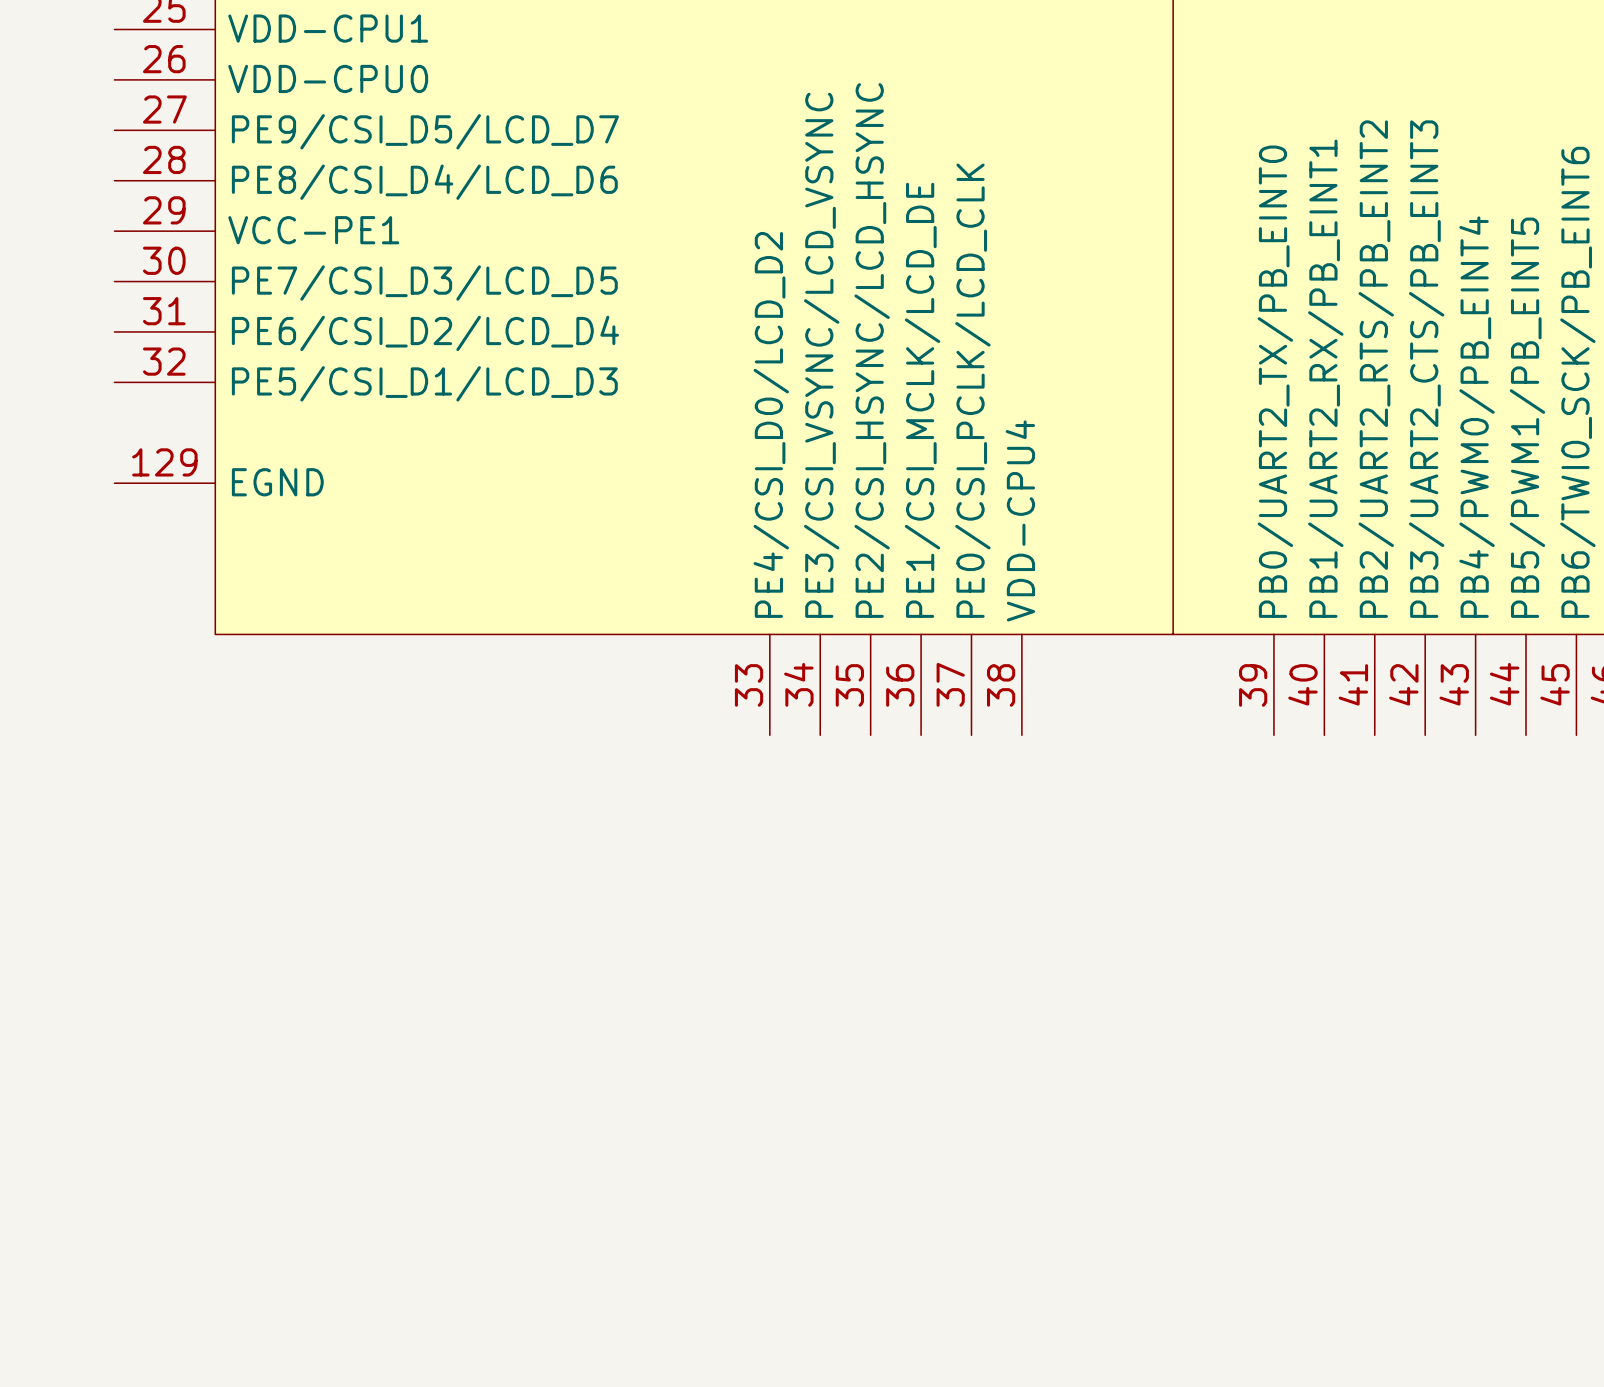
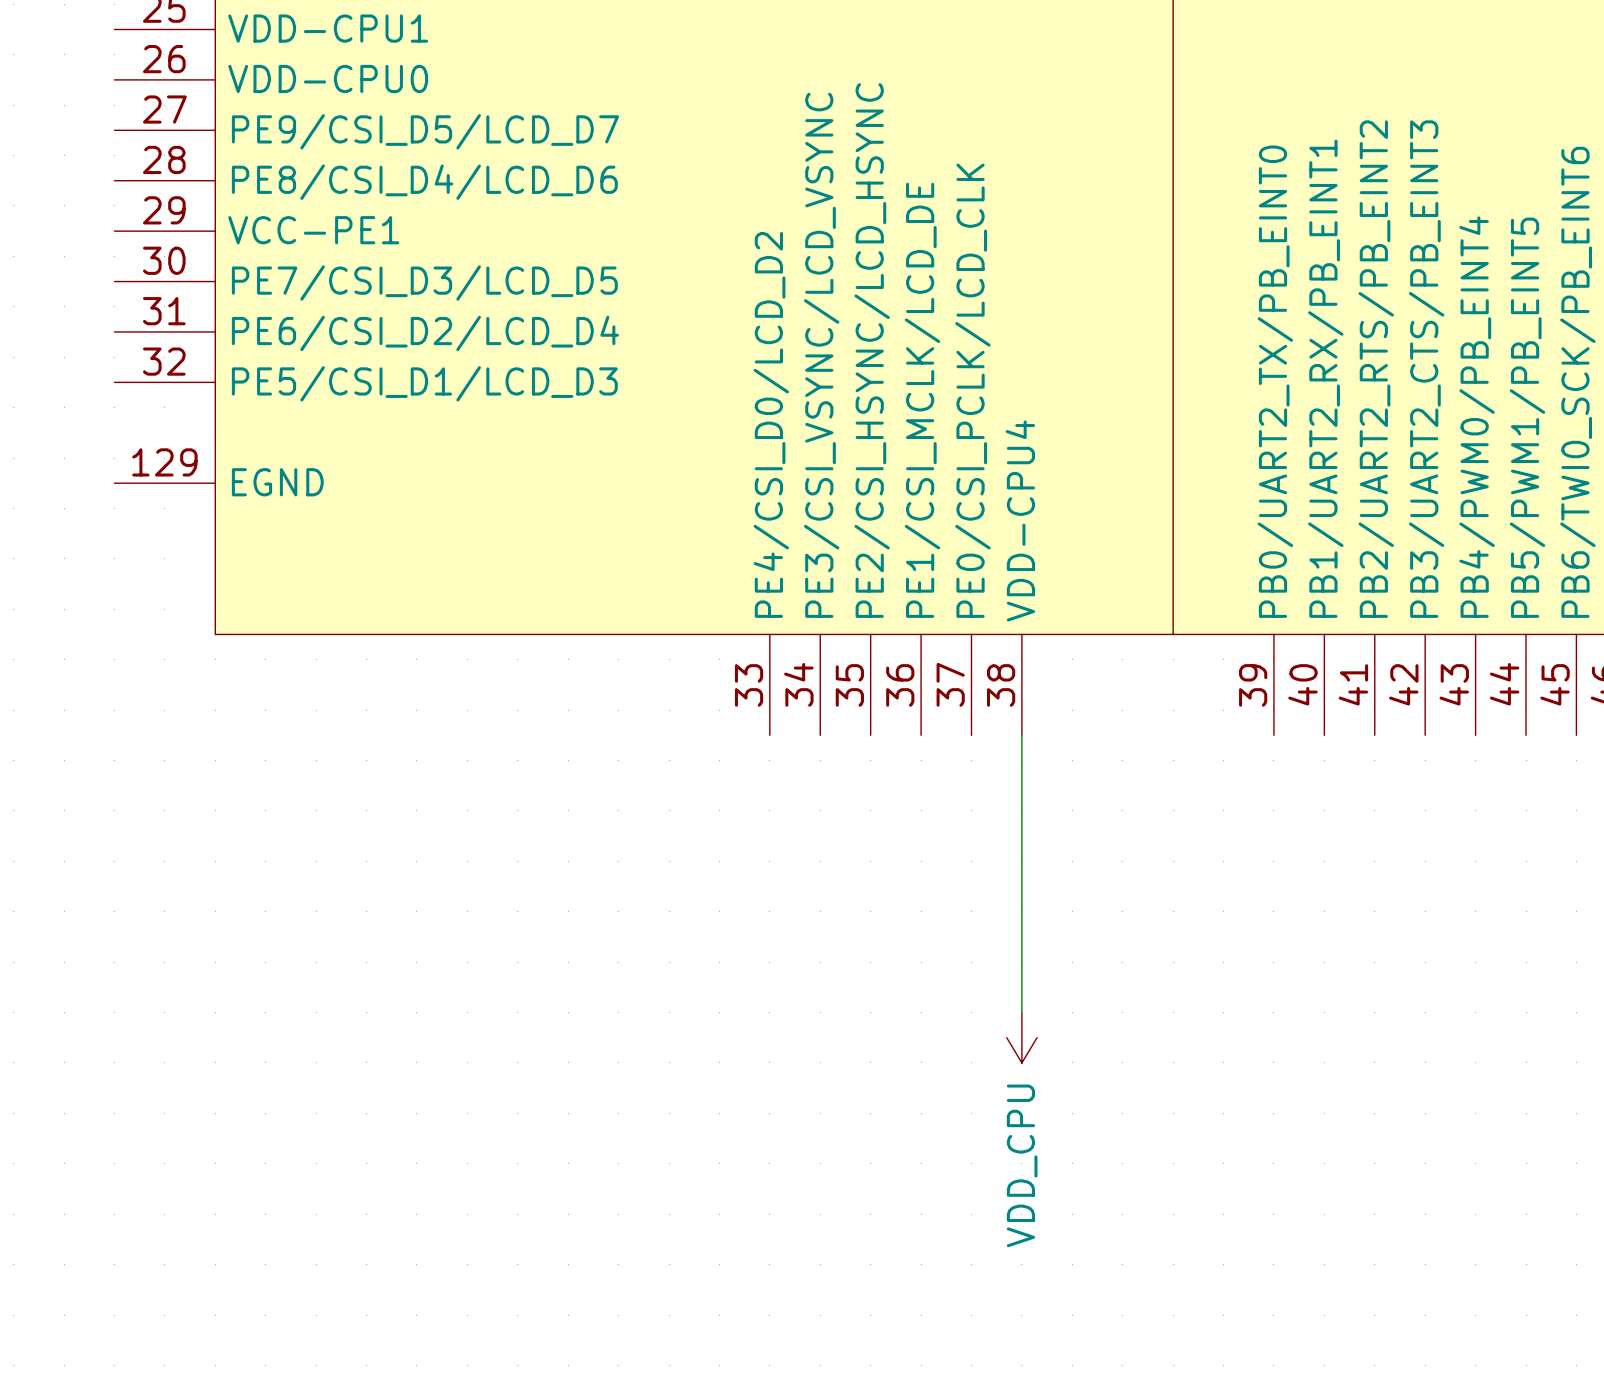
wire: none -> (1021, 735) (1021, 1012)
power symbol: none -> VDD_CPU (1021, 1037)

